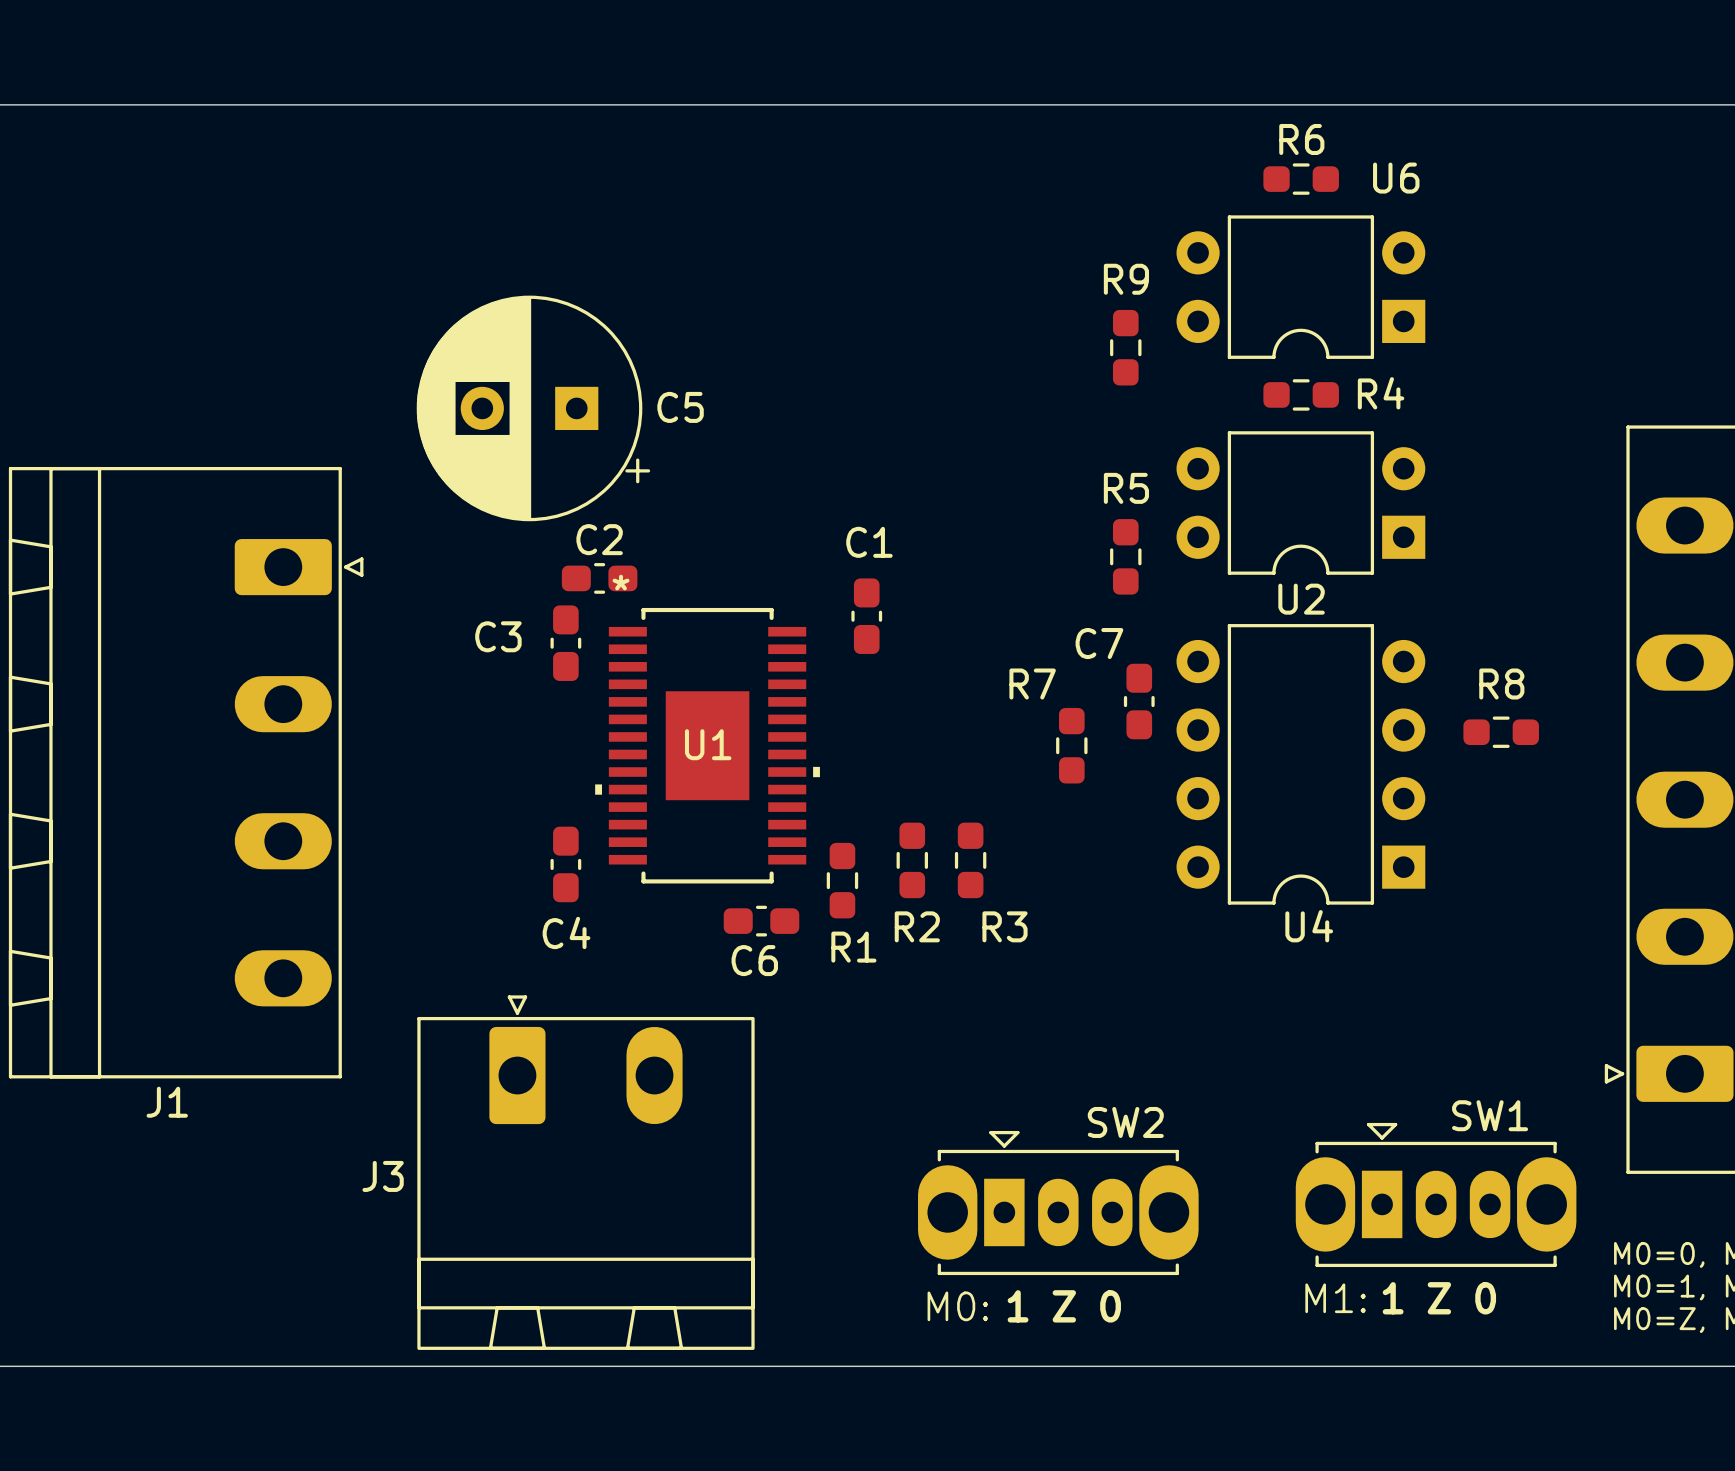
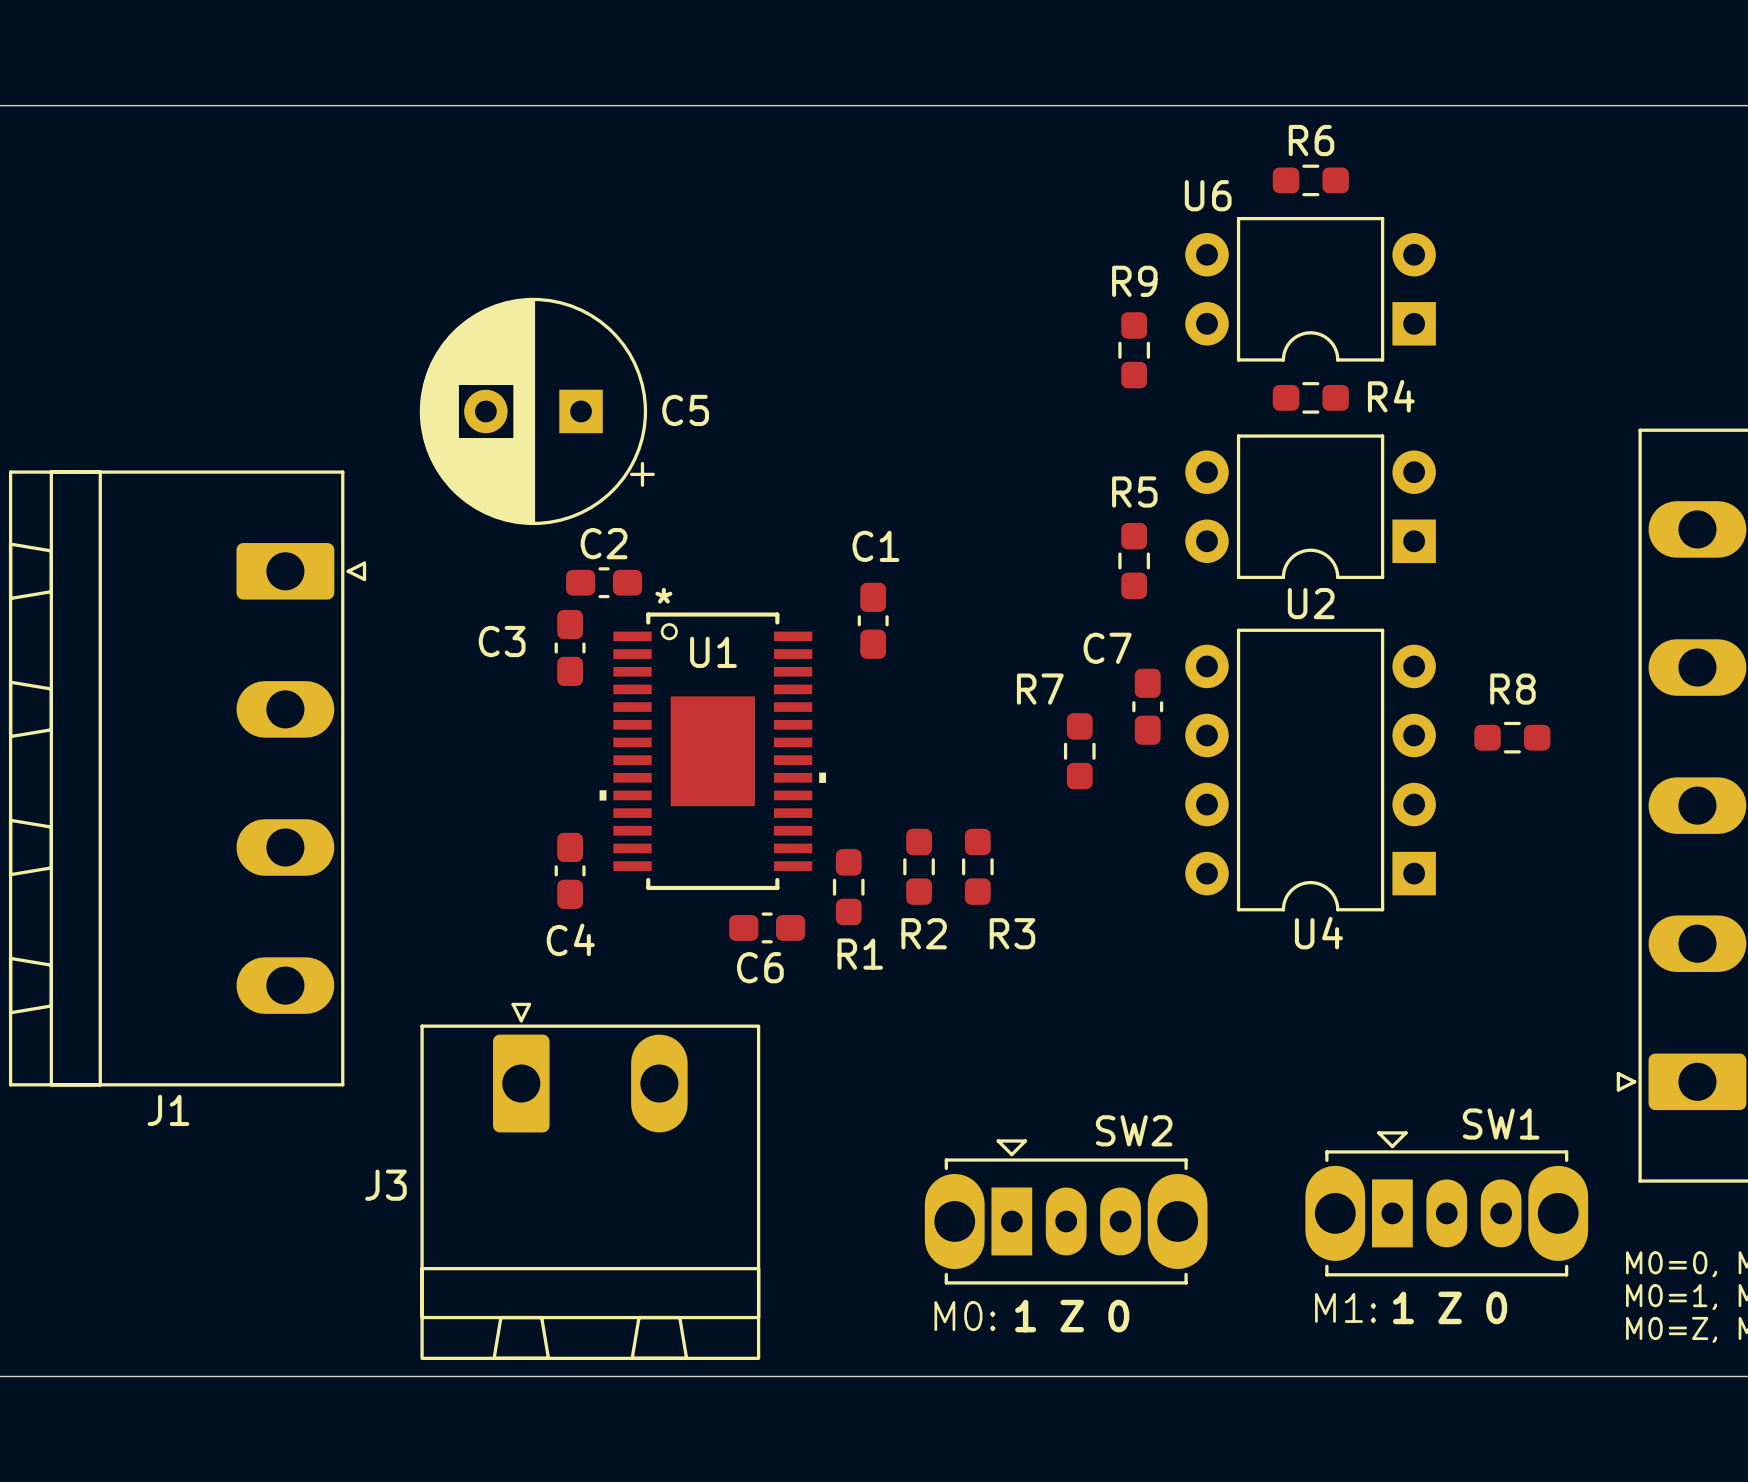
U6 name position: U6 (1396, 178) -> U6 (1208, 195)
U1 text position: * (621, 582) -> * (663, 595)
drawing: none -> [660, 623, 678, 641]
U1 name position: U1 (708, 744) -> U1 (713, 652)

